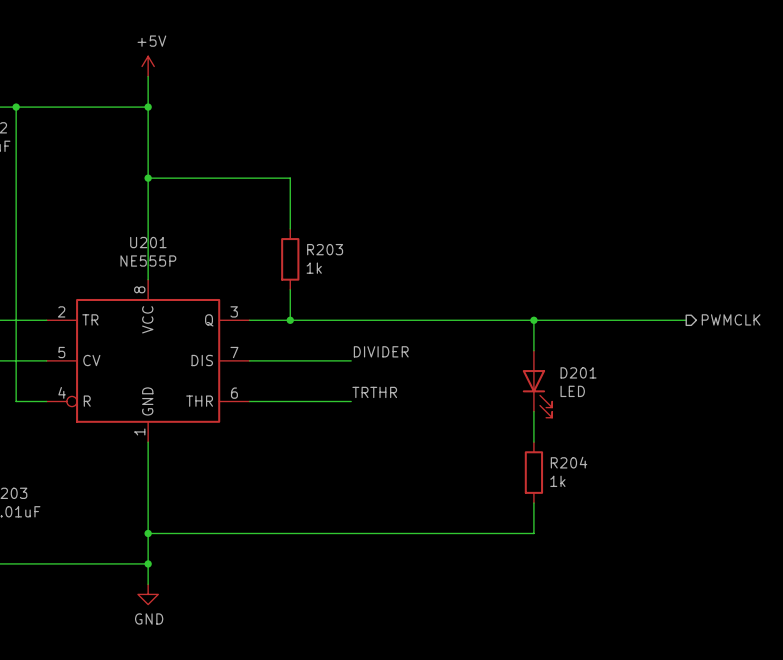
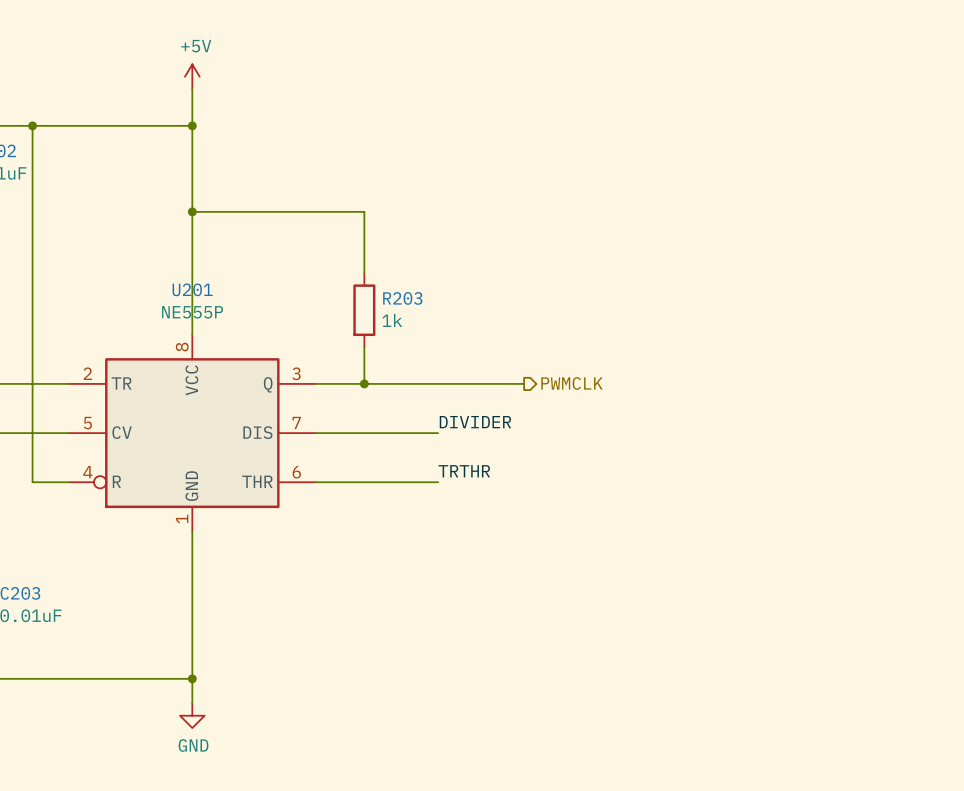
hierarchical label: none -> PWMCLK (572, 383)
hierarchical label: PWMCLK (731, 319) -> none
wire: (422, 320) (686, 320) -> none
wire: (533, 320) (533, 350) -> none
junction: (533, 320) -> none
D201: LED (537, 384) -> none
wire: (533, 411) (533, 442) -> none
R204: 1k (533, 472) -> none
wire: (533, 503) (533, 533) (148, 533) -> none
junction: (148, 533) -> none

